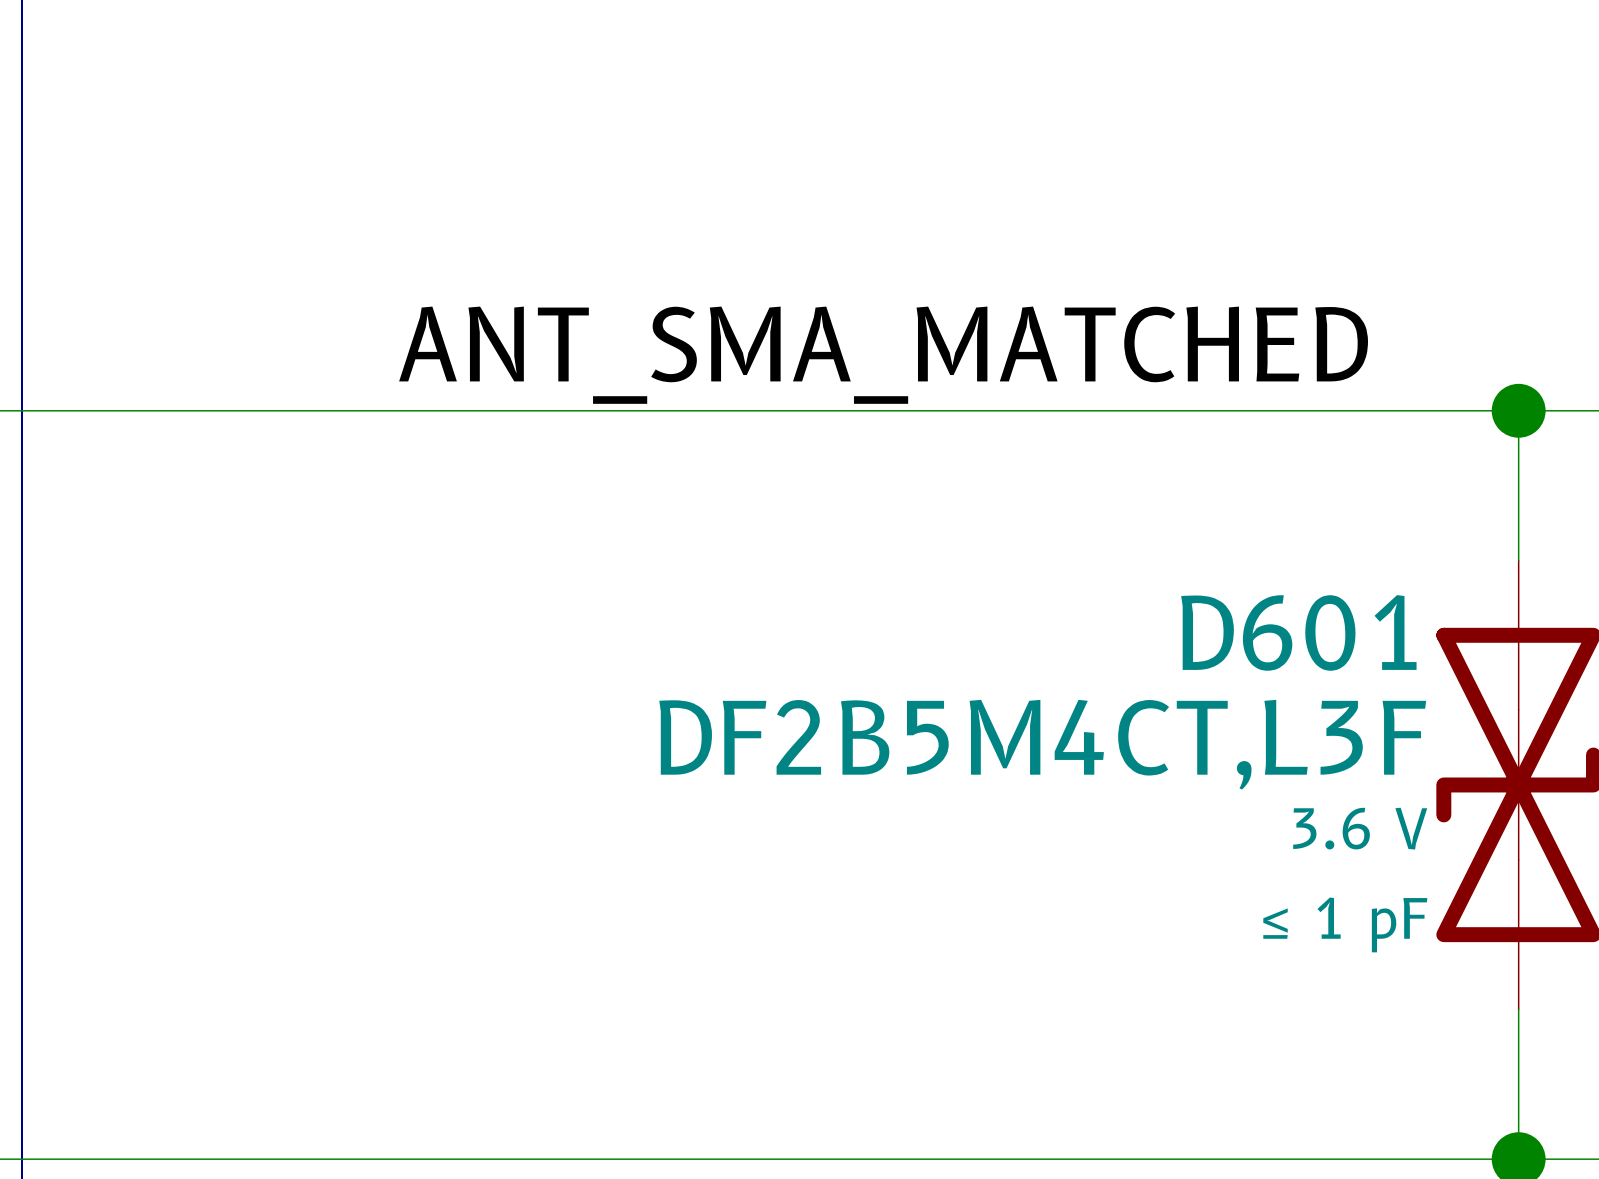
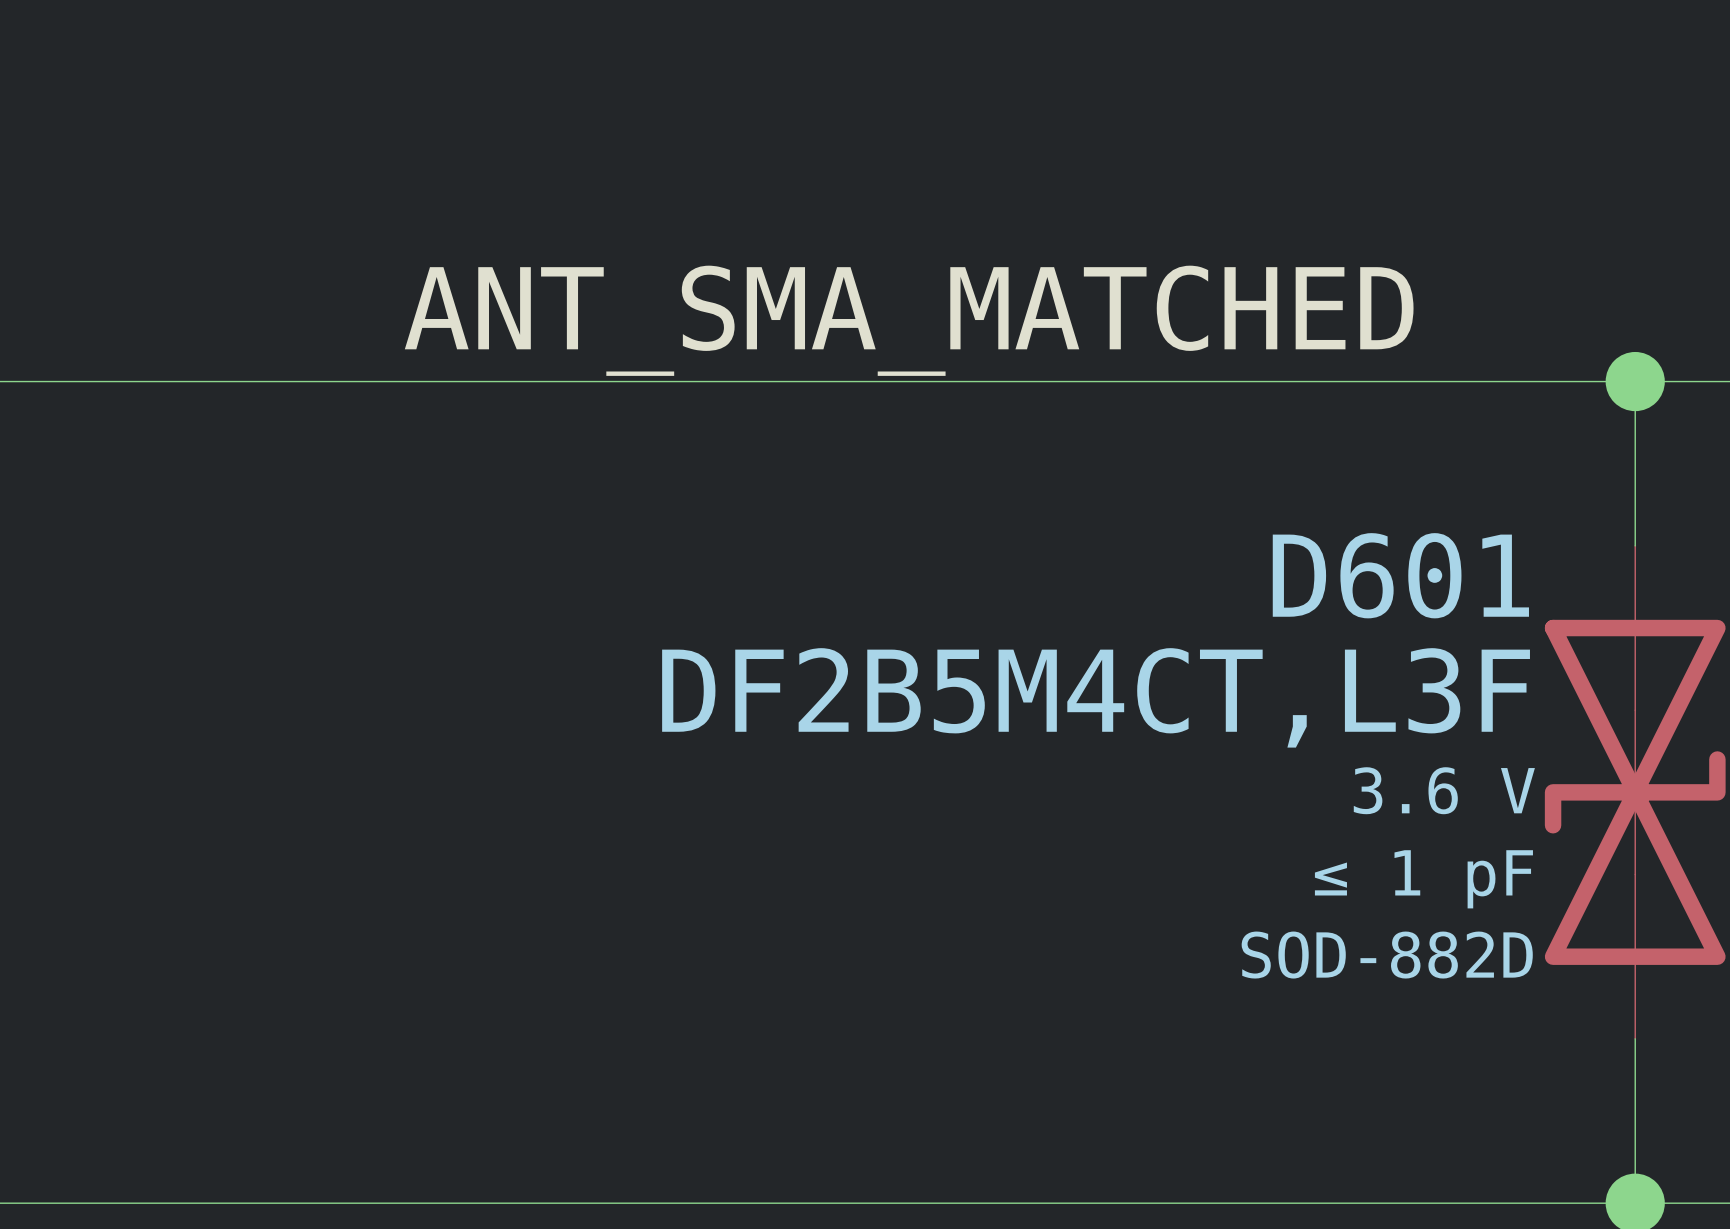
D601 name position: D601 (1298, 632) -> D601 (1400, 575)
D601 value position: DF2B5M4CT,L3F (1042, 744) -> DF2B5M4CT,L3F (1096, 697)
D601 text position: 3.6 V (1360, 828) -> 3.6 V (1444, 790)
D601 text position: ≤ 1 pF (1345, 924) -> ≤ 1 pF (1423, 879)
D601 text: none -> SOD-882D (1387, 955)

